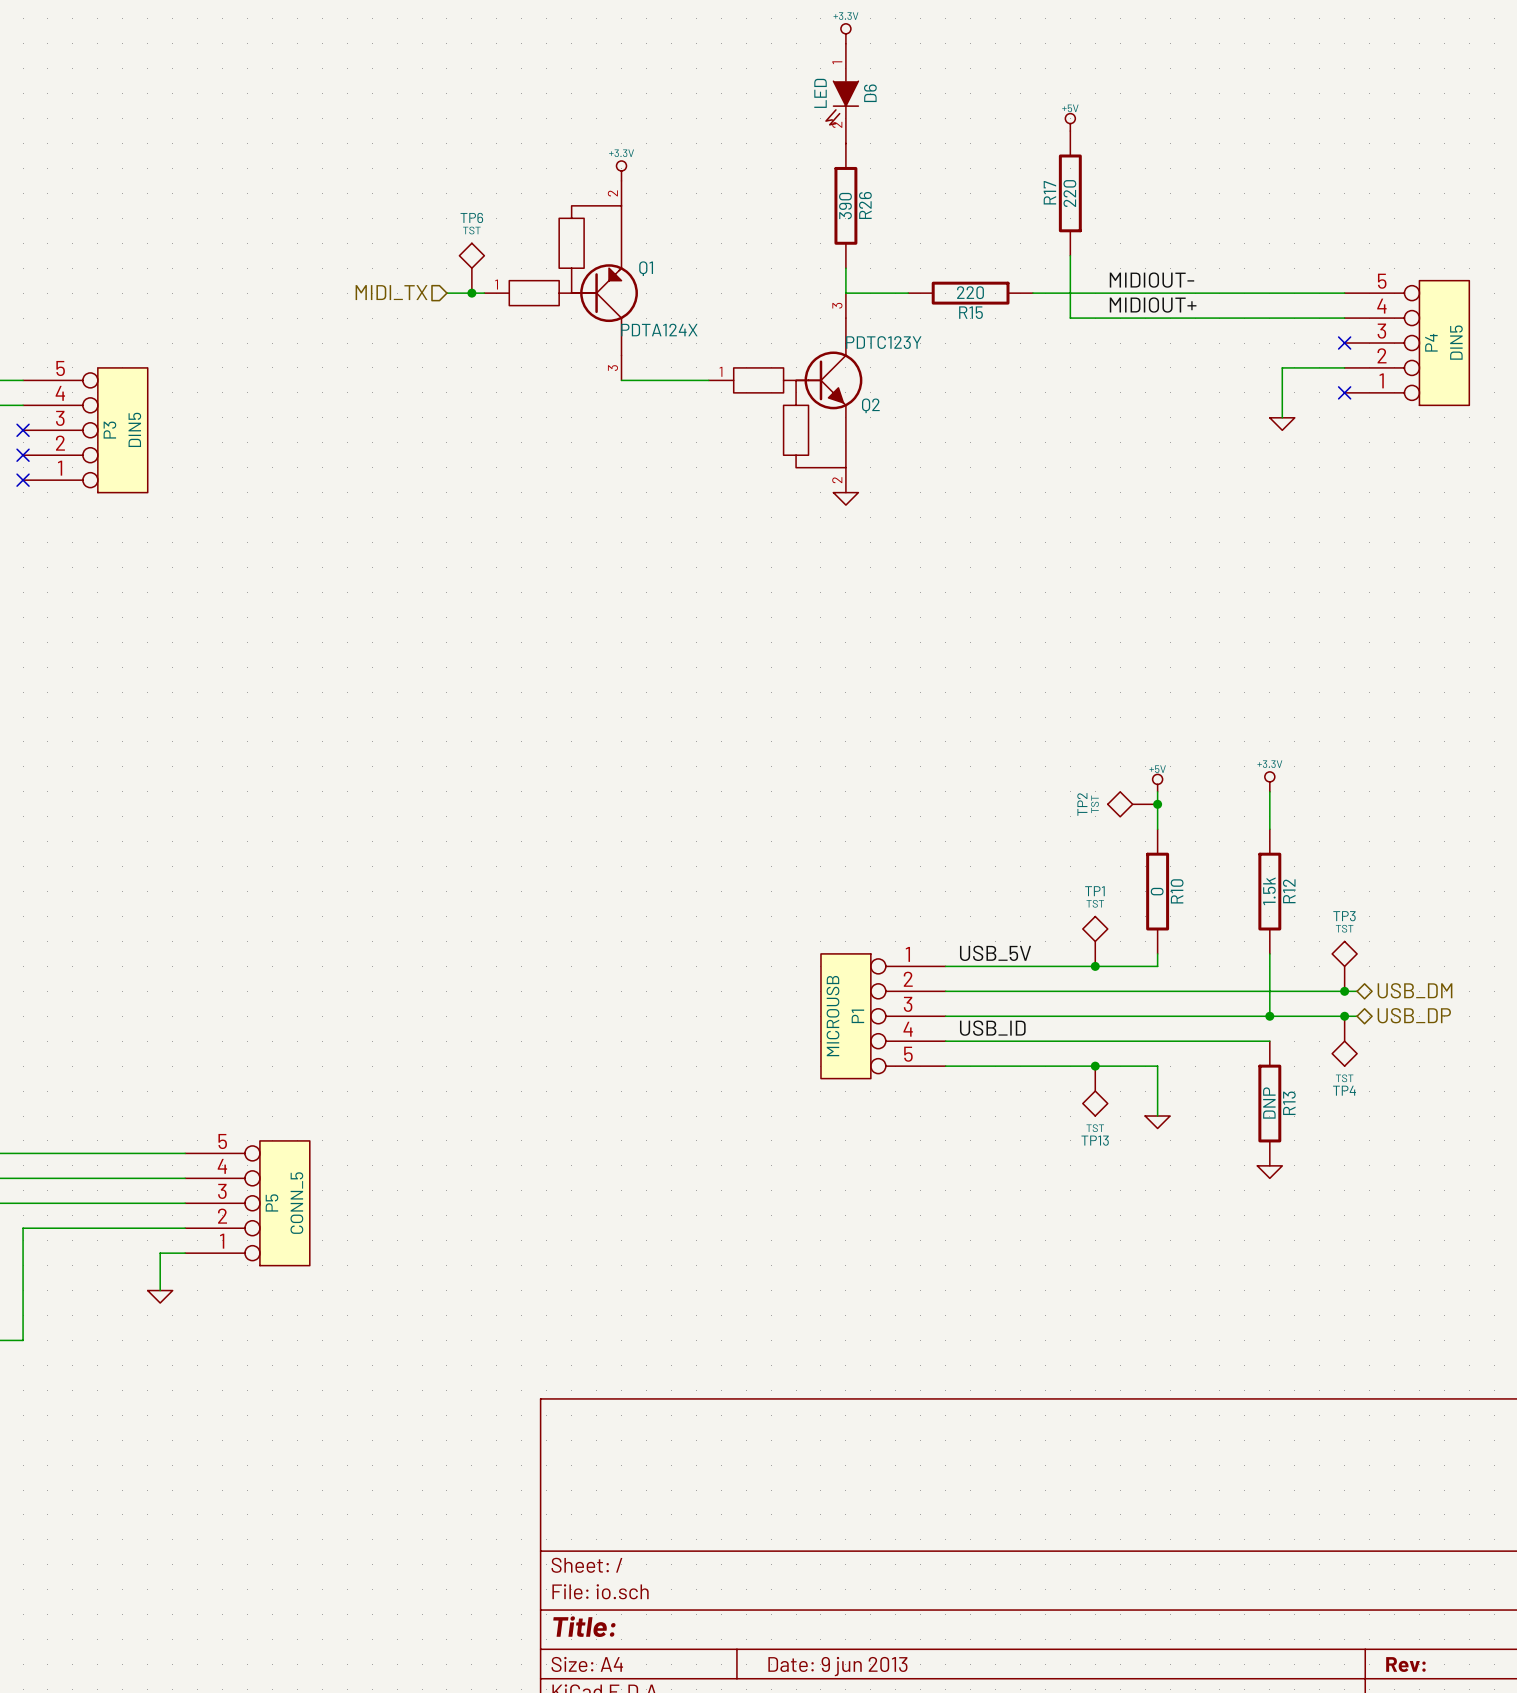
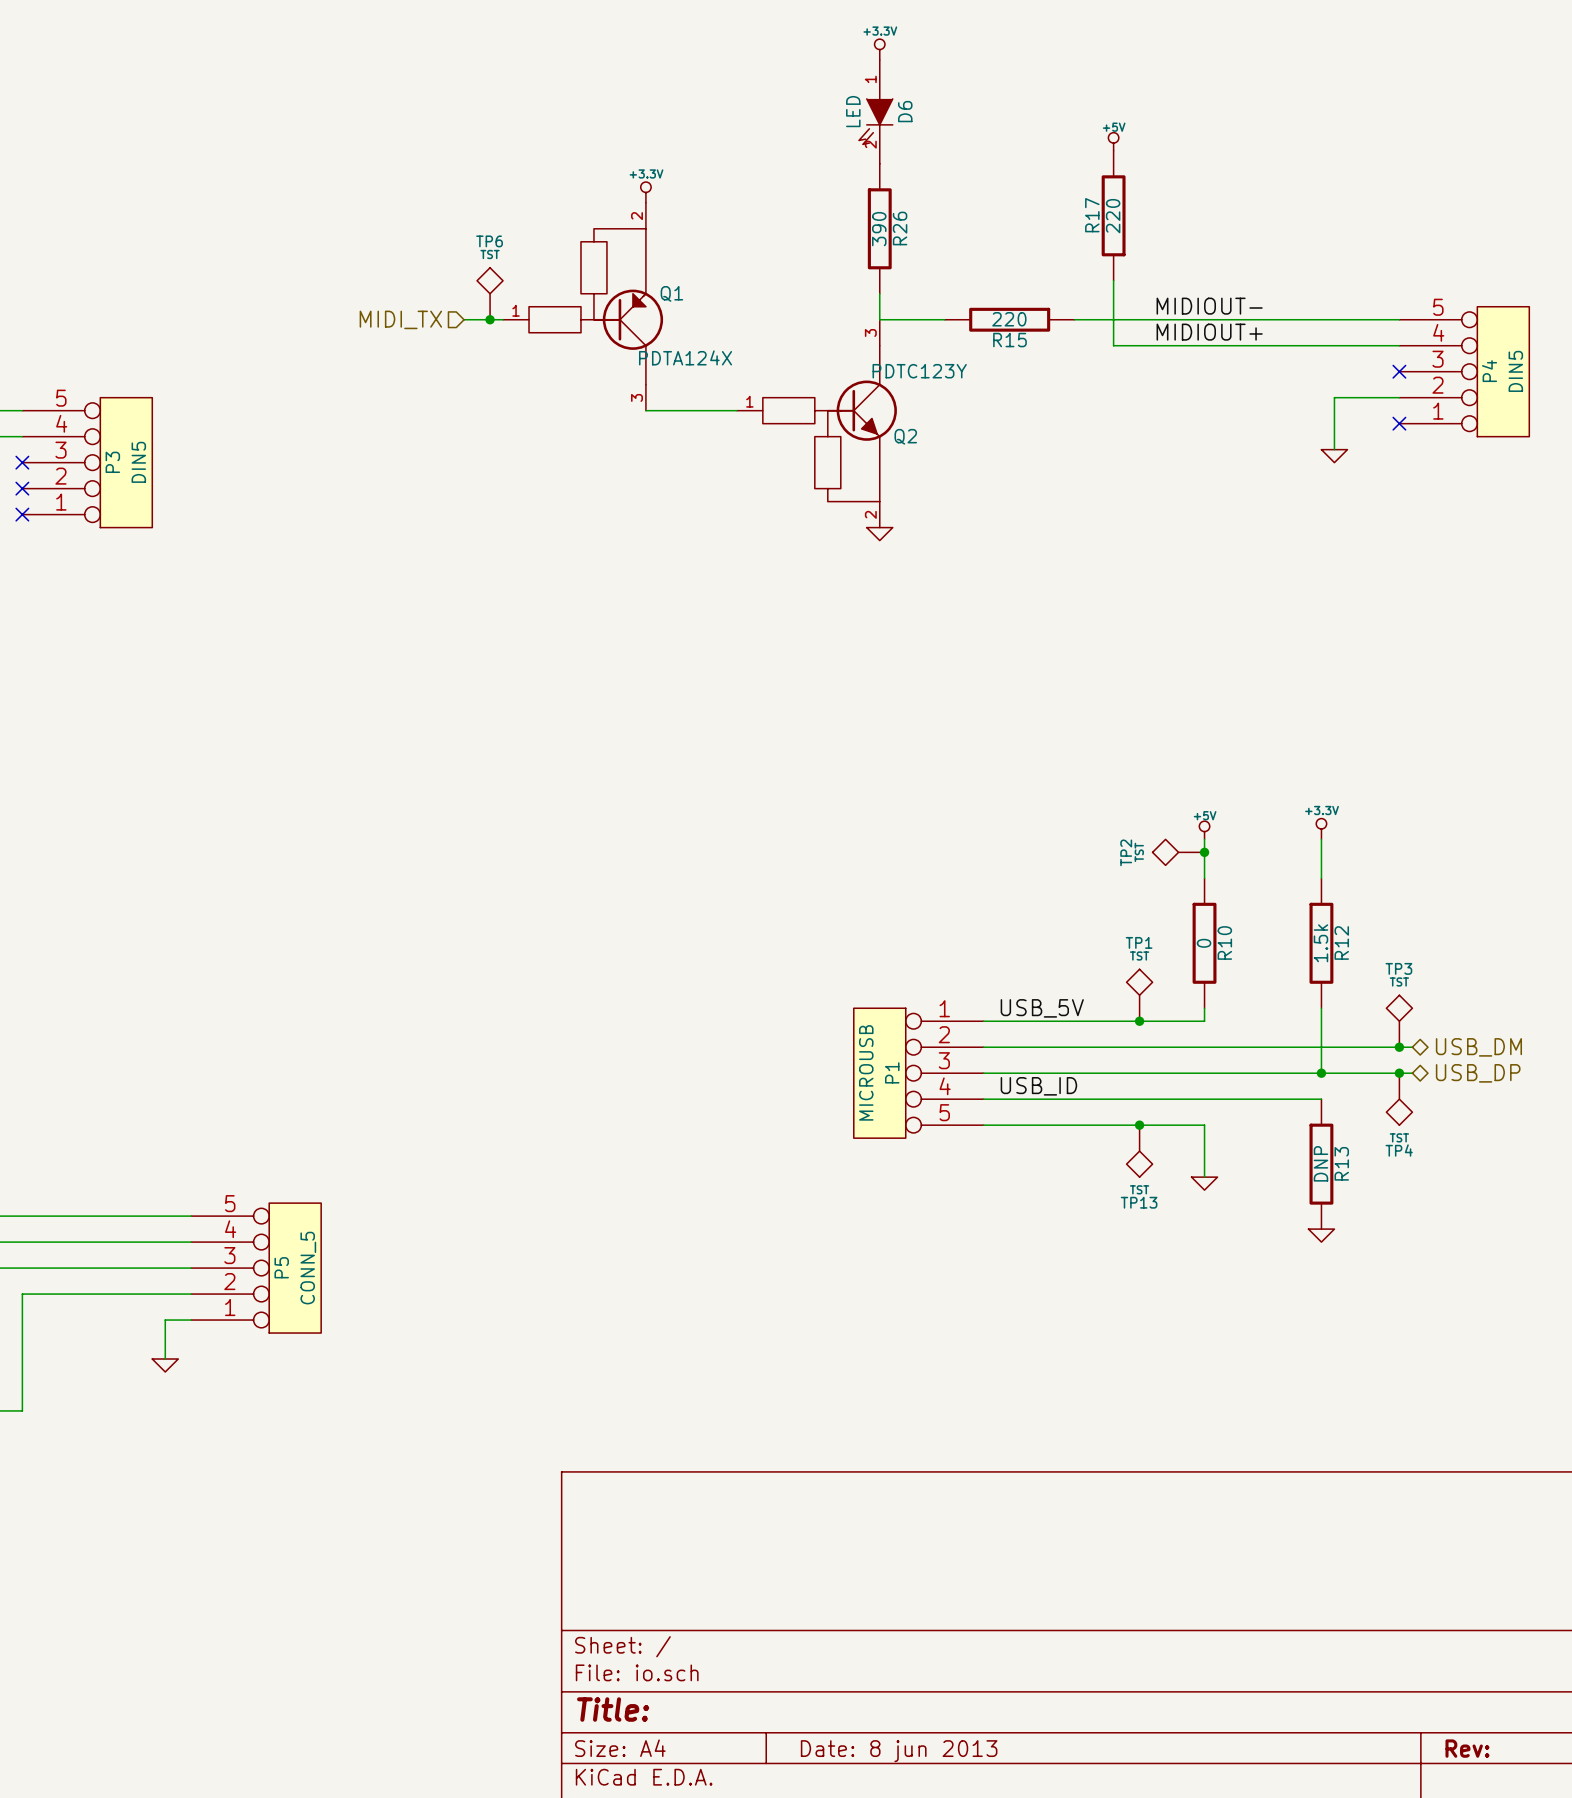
title block: Date: 9 jun 2013 (837, 1666) -> Date: 8 jun 2013 (899, 1751)

